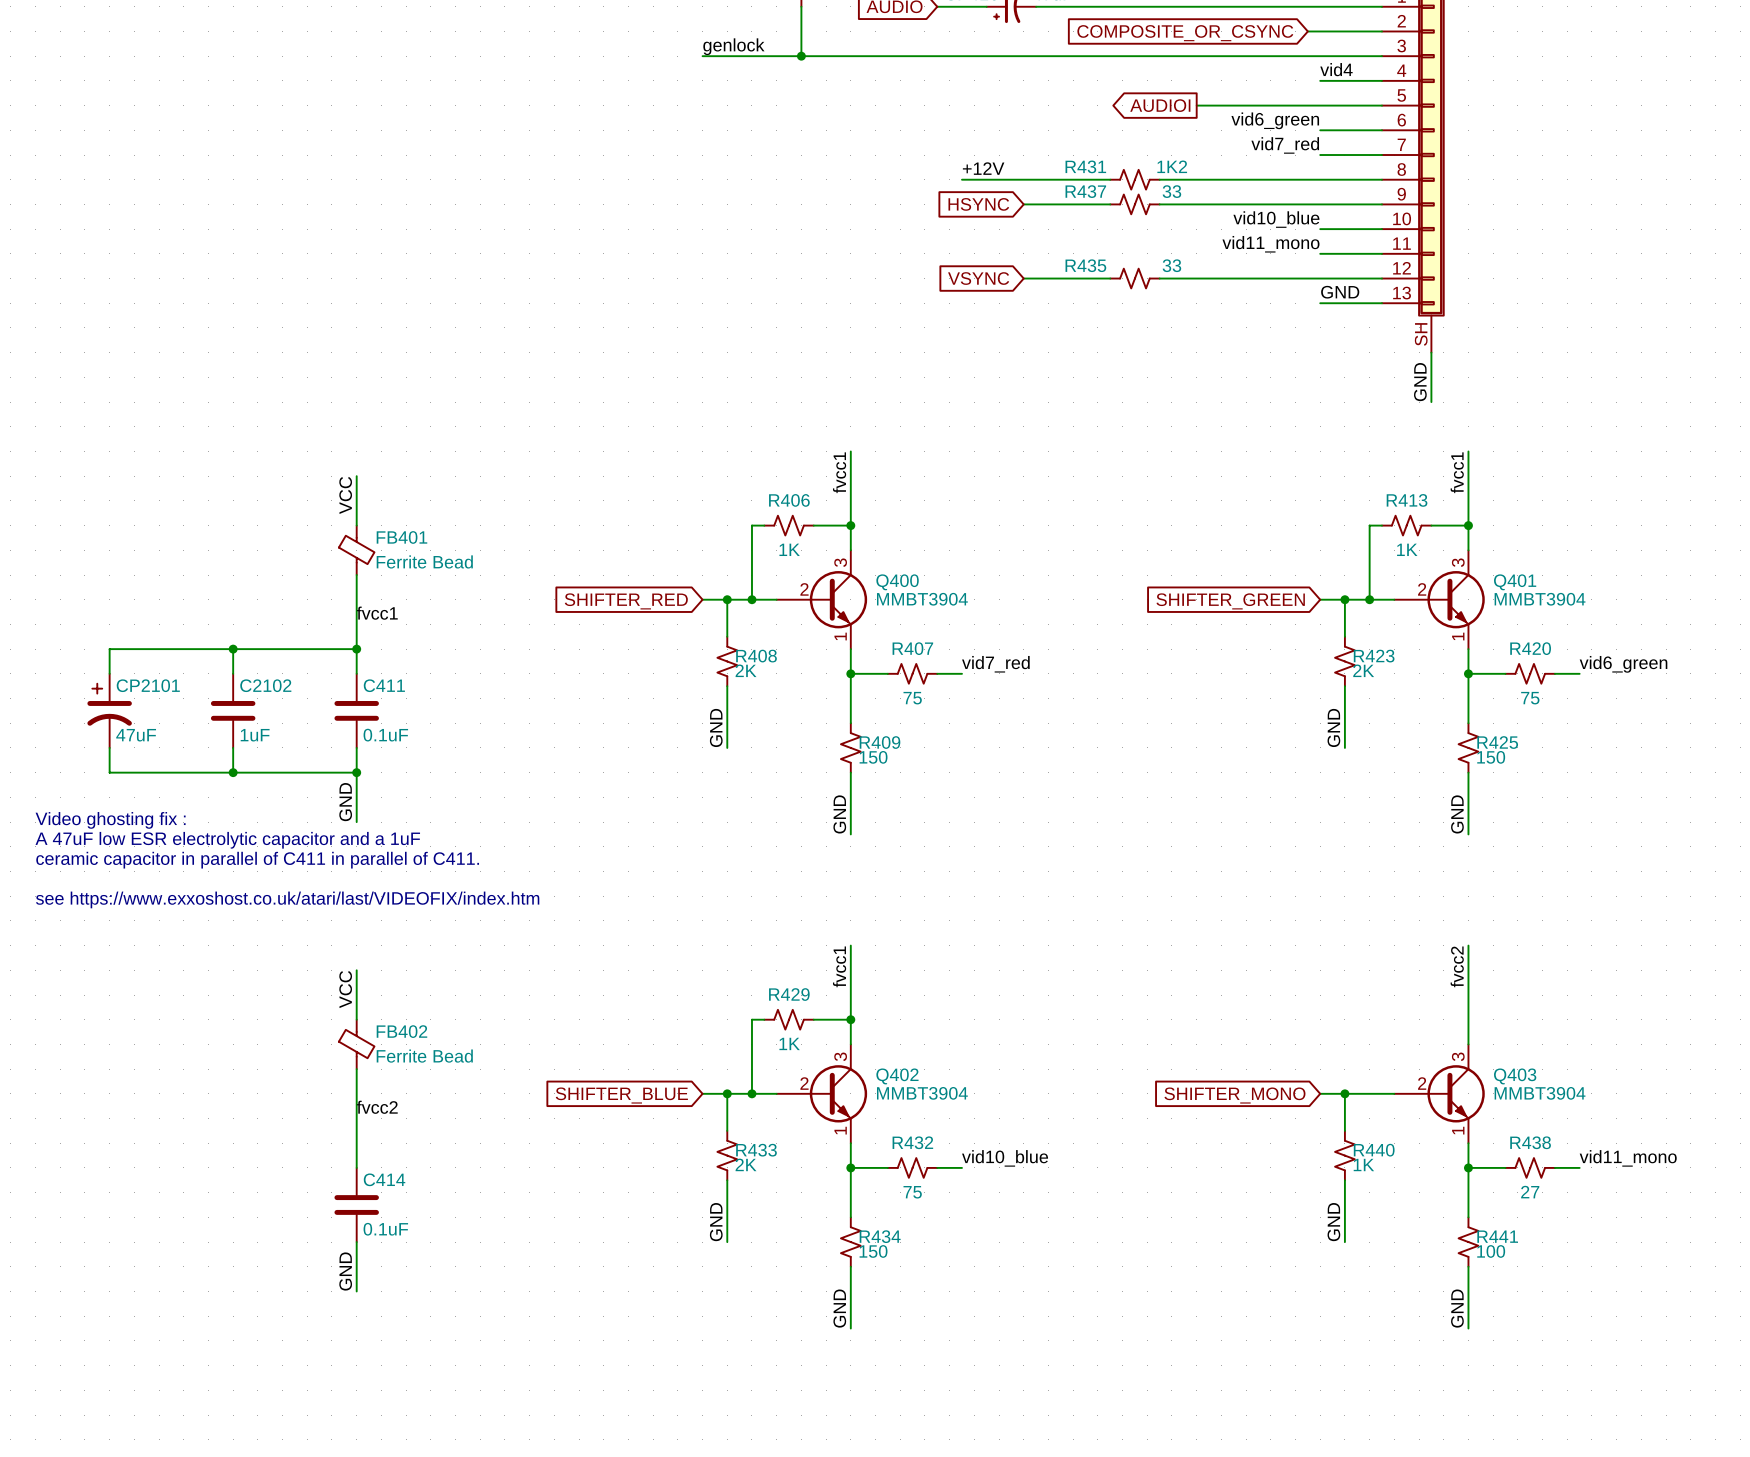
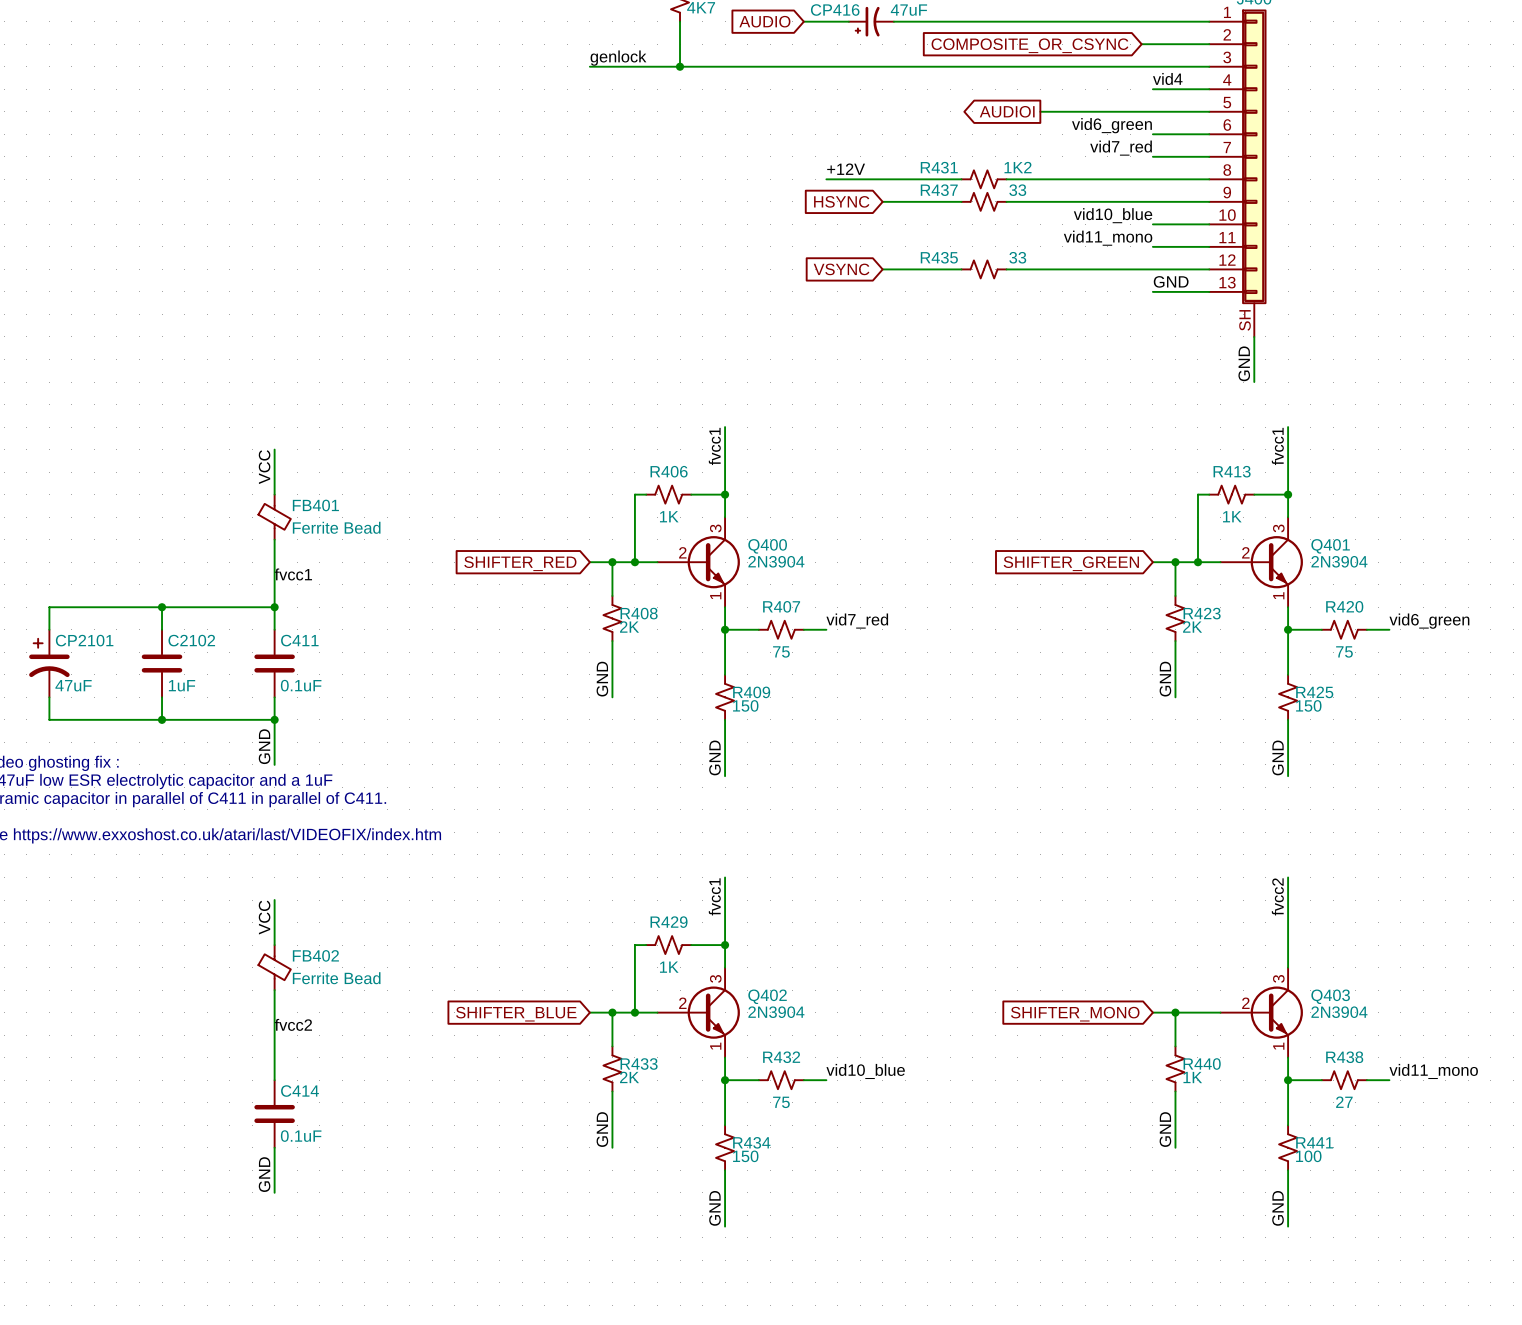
Q400 value: MMBT3904 (922, 599) -> 2N3904 (776, 561)
Q401 value: MMBT3904 (1540, 599) -> 2N3904 (1339, 561)
Q402 value: MMBT3904 (922, 1093) -> 2N3904 (776, 1012)
Q403 value: MMBT3904 (1540, 1093) -> 2N3904 (1339, 1012)

